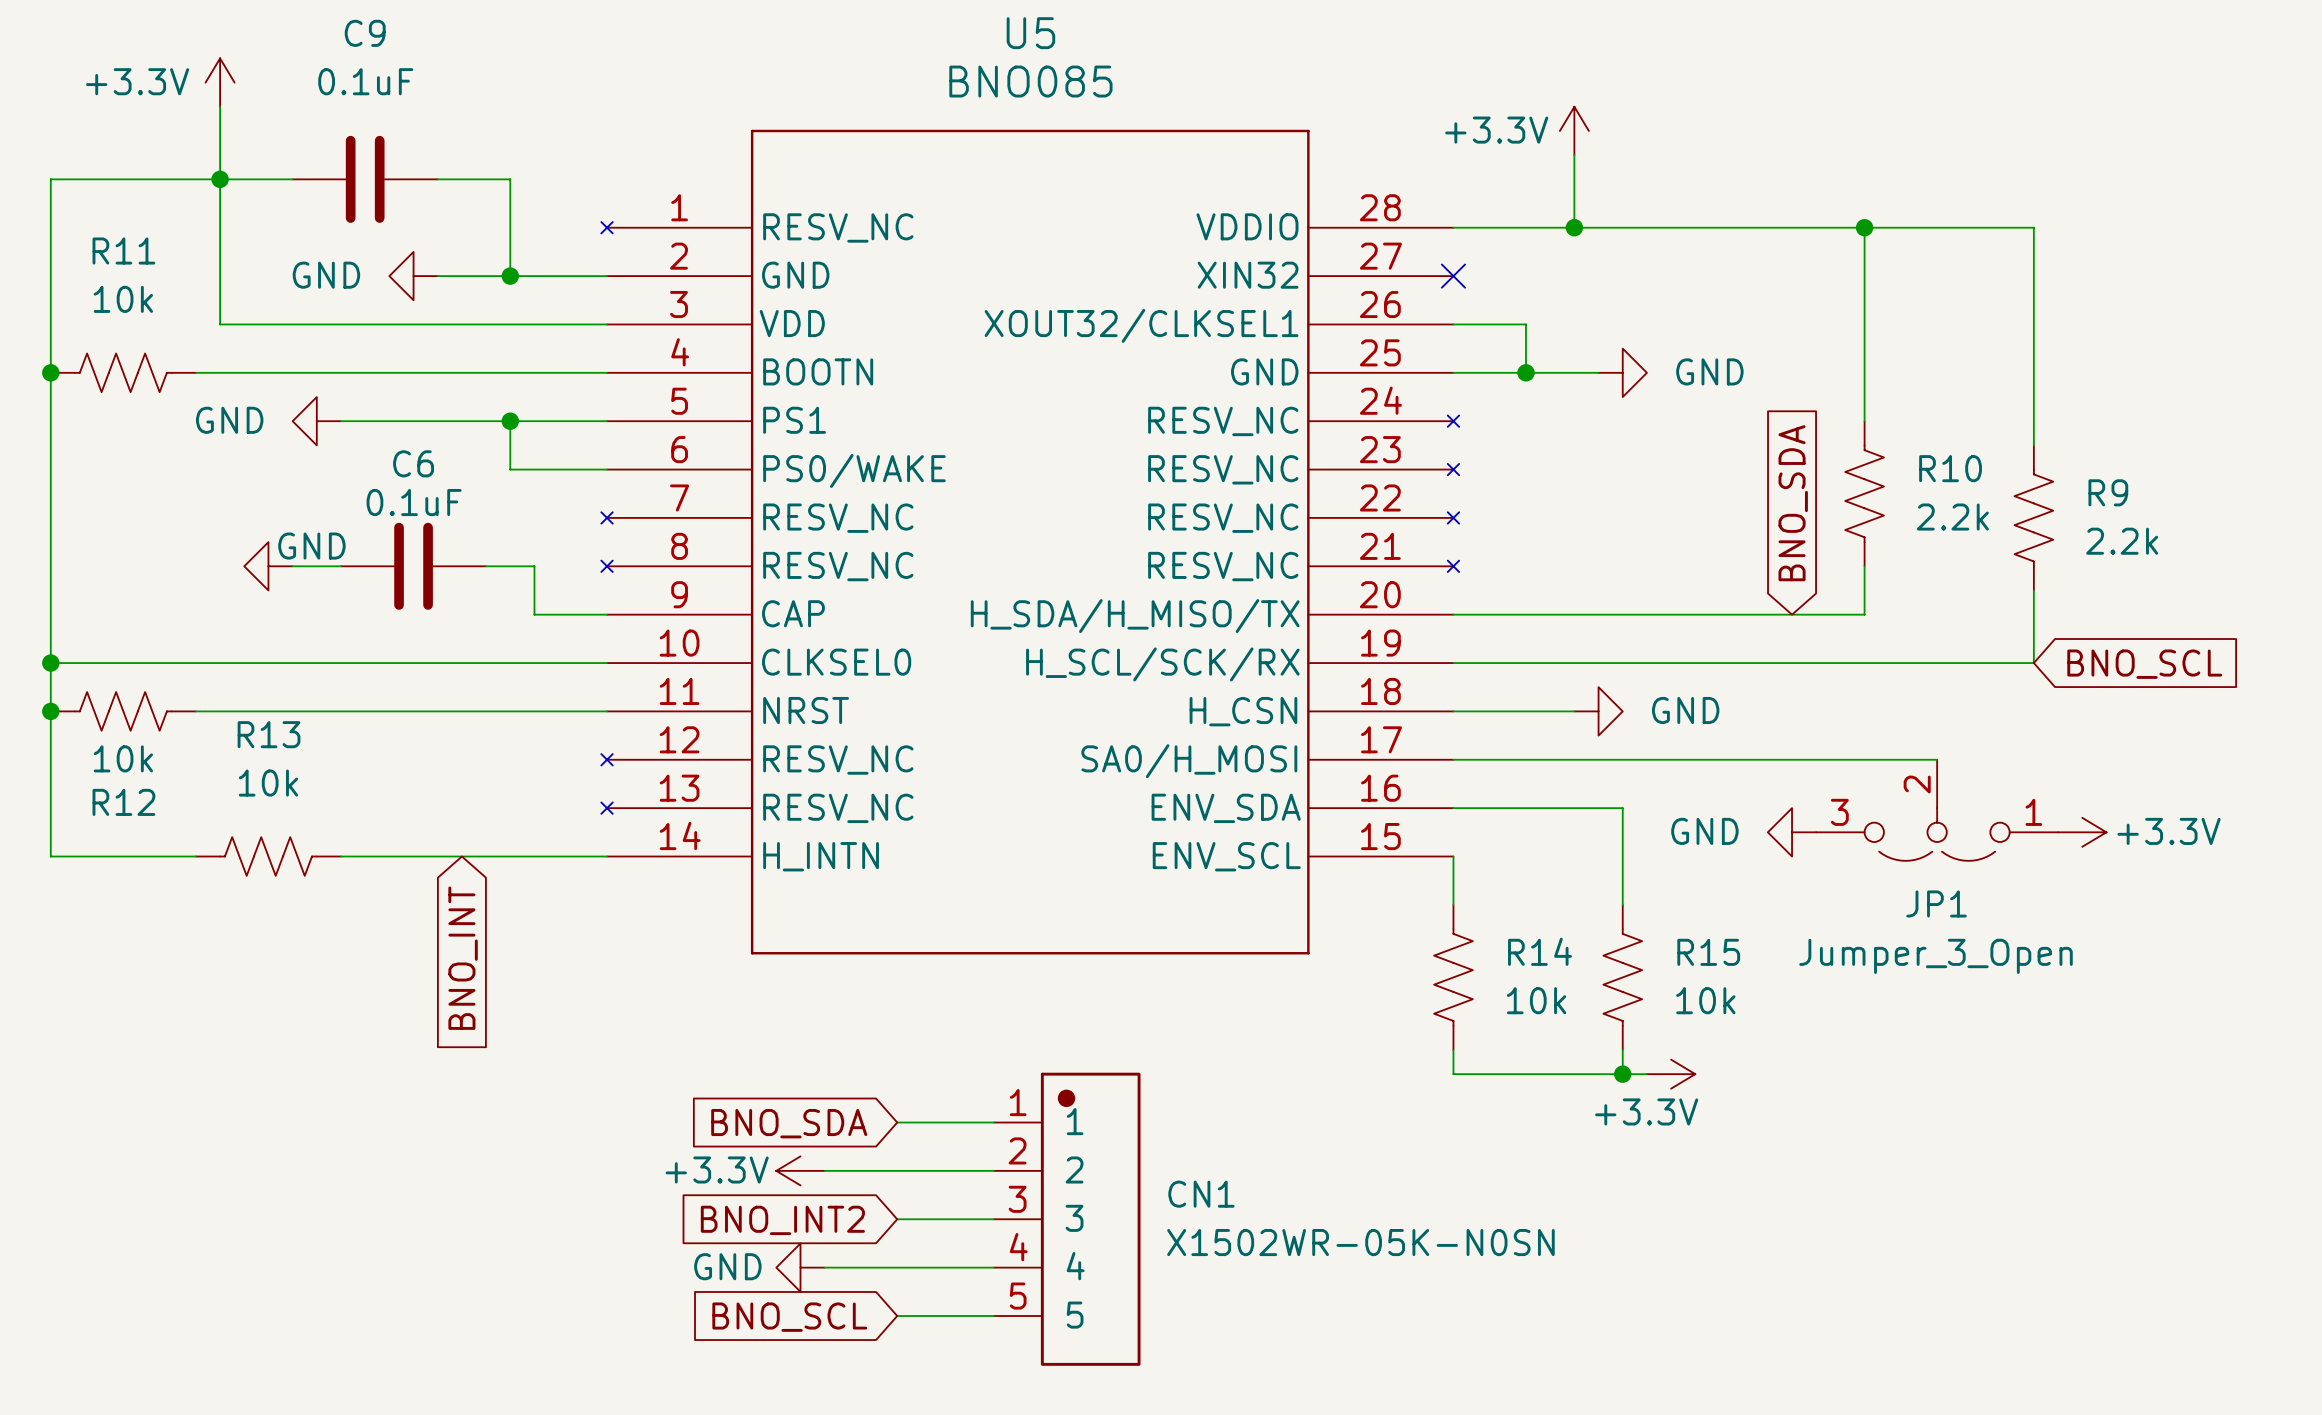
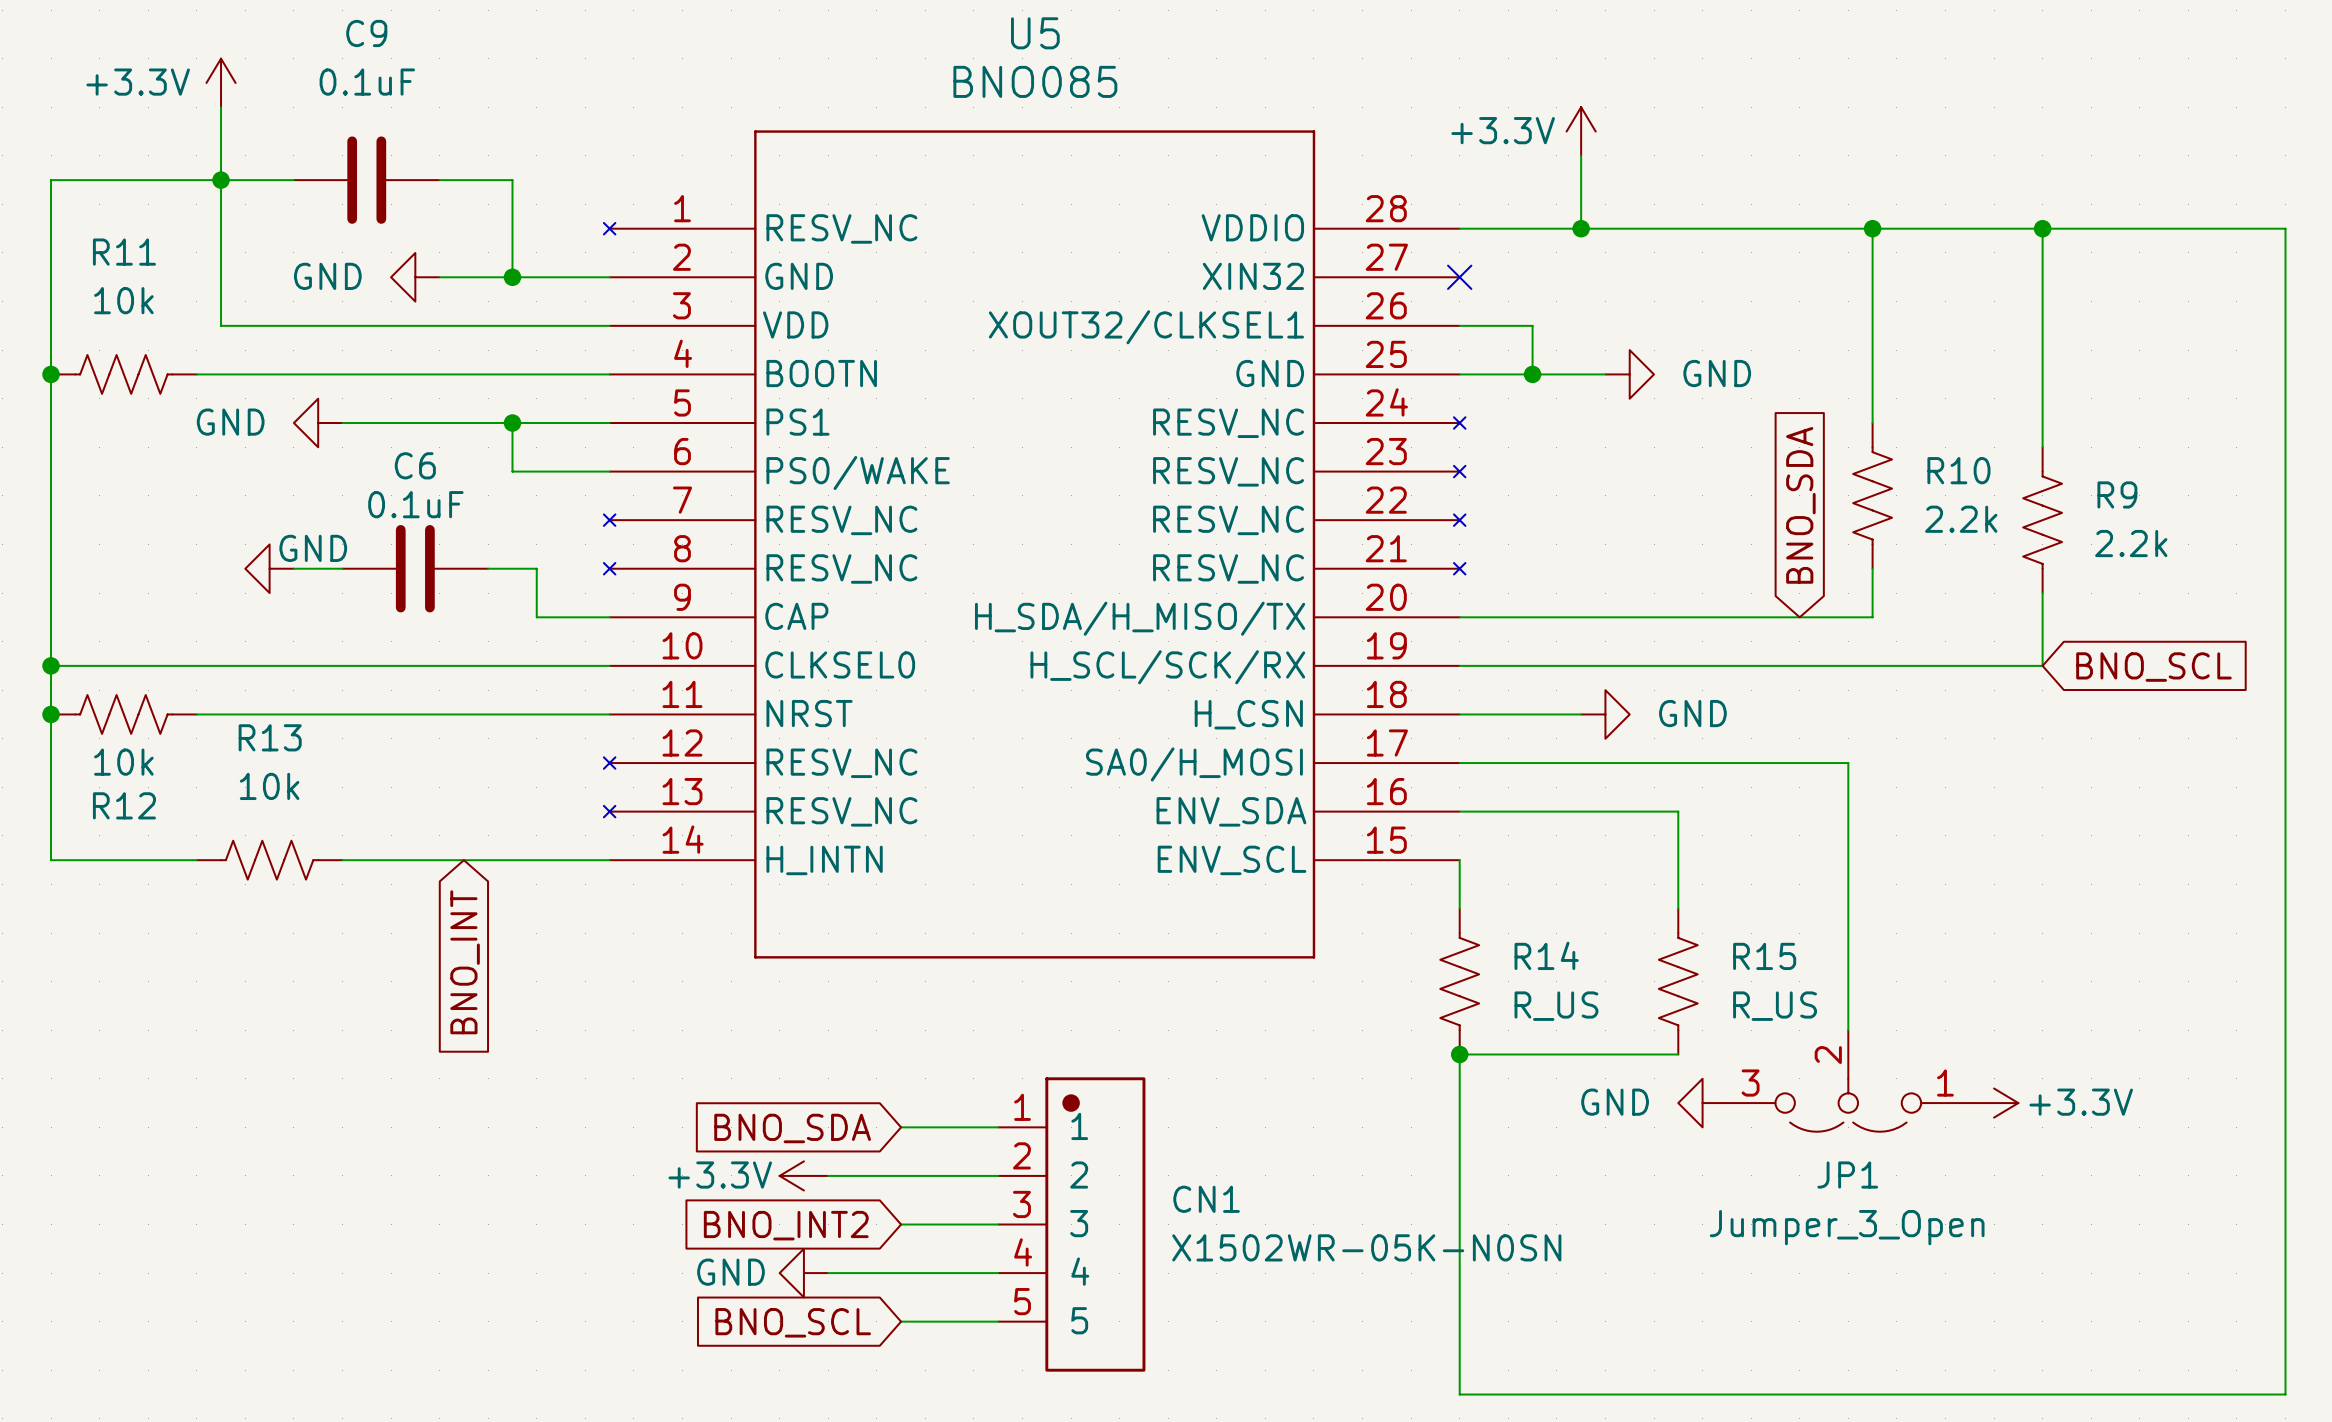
junction: none -> (2042, 228)
wire: (1840, 759) (1937, 759) -> (1848, 763) (1848, 1030)
wire: (1622, 808) (1622, 904) -> (1629, 811) (1678, 811) (1678, 908)
JP1 position: (1937, 810) -> (1848, 1080)
power symbol position: GND (1792, 832) -> GND (1702, 1103)
power symbol: +3.3V (2082, 832) -> none
R15 position: (1622, 977) -> (1678, 981)
R14 value: 10k (1536, 1000) -> R_US (1556, 1006)
R15 value: 10k (1705, 1000) -> R_US (1775, 1006)
wire: none -> (1459, 1054) (1678, 1054)
junction: none -> (1459, 1054)
wire: (1622, 1049) (1622, 1074) -> none
wire: (1453, 1074) (1646, 1074) -> (1459, 1078) (1459, 1394) (2285, 1394) (2285, 228) (2042, 228)
junction: (1622, 1074) -> none
power symbol: +3.3V (1671, 1074) -> none
power symbol: none -> +3.3V (1994, 1103)

